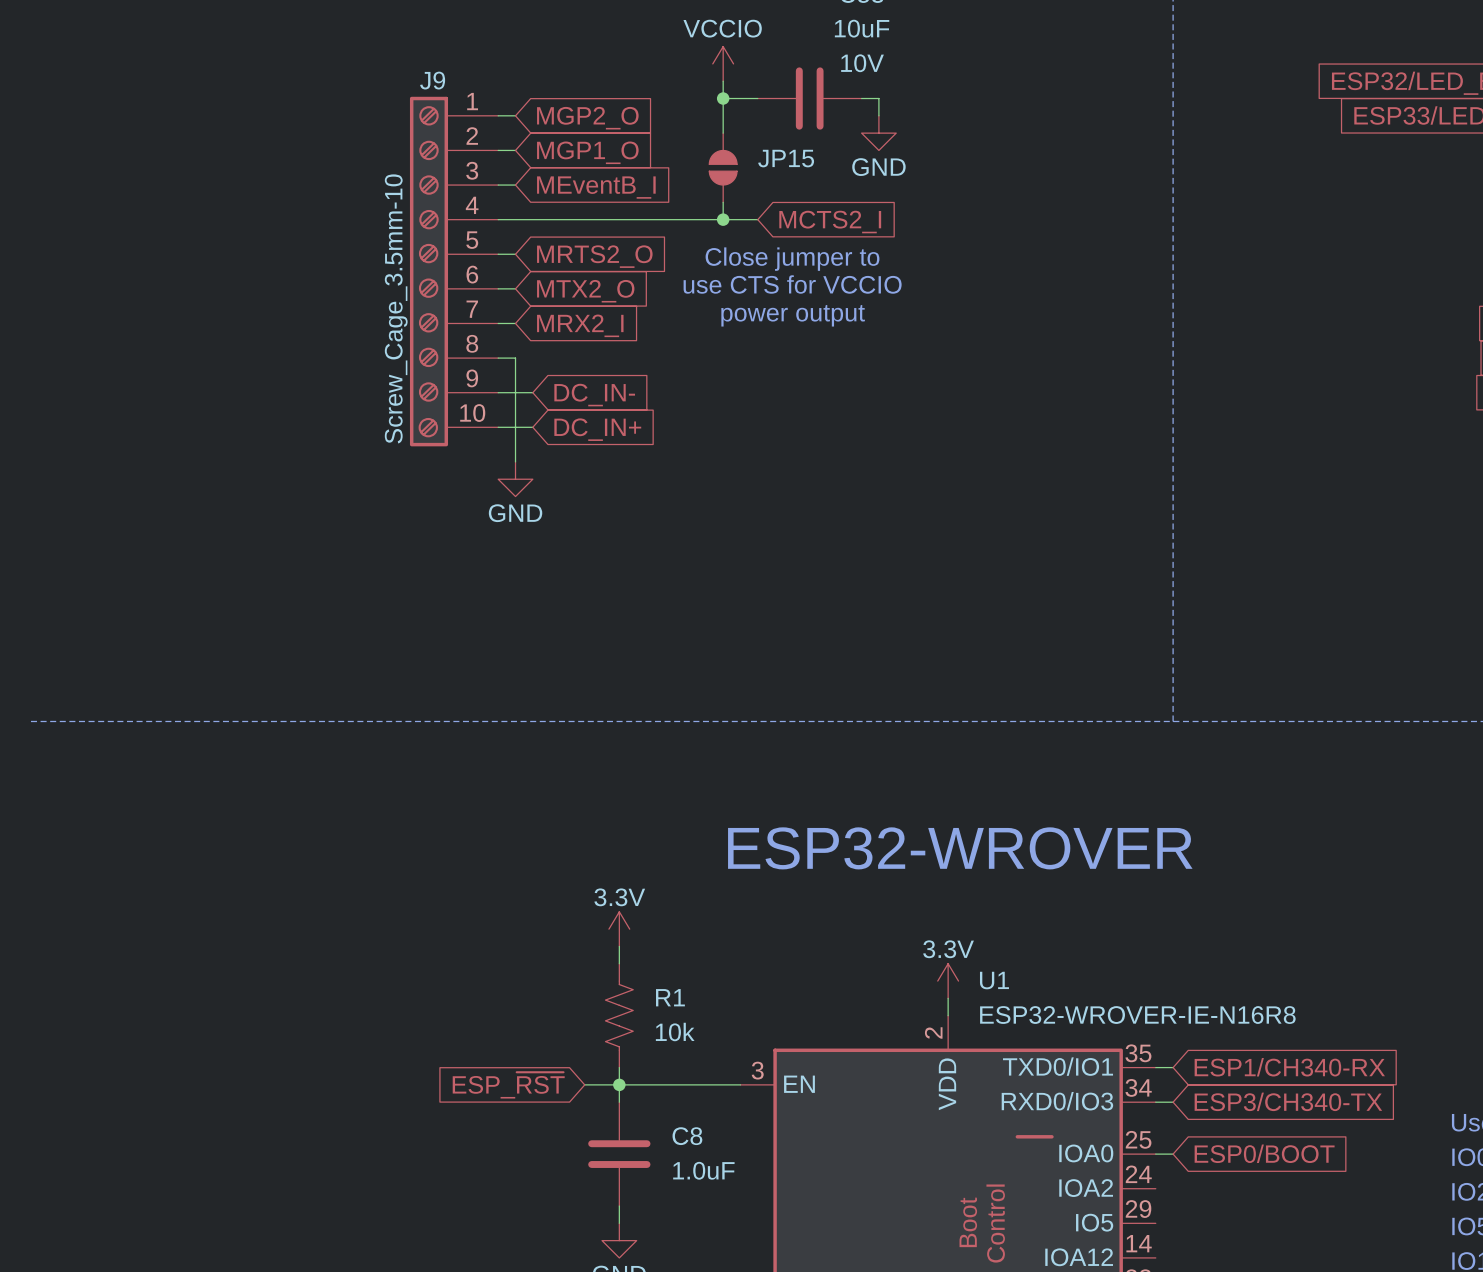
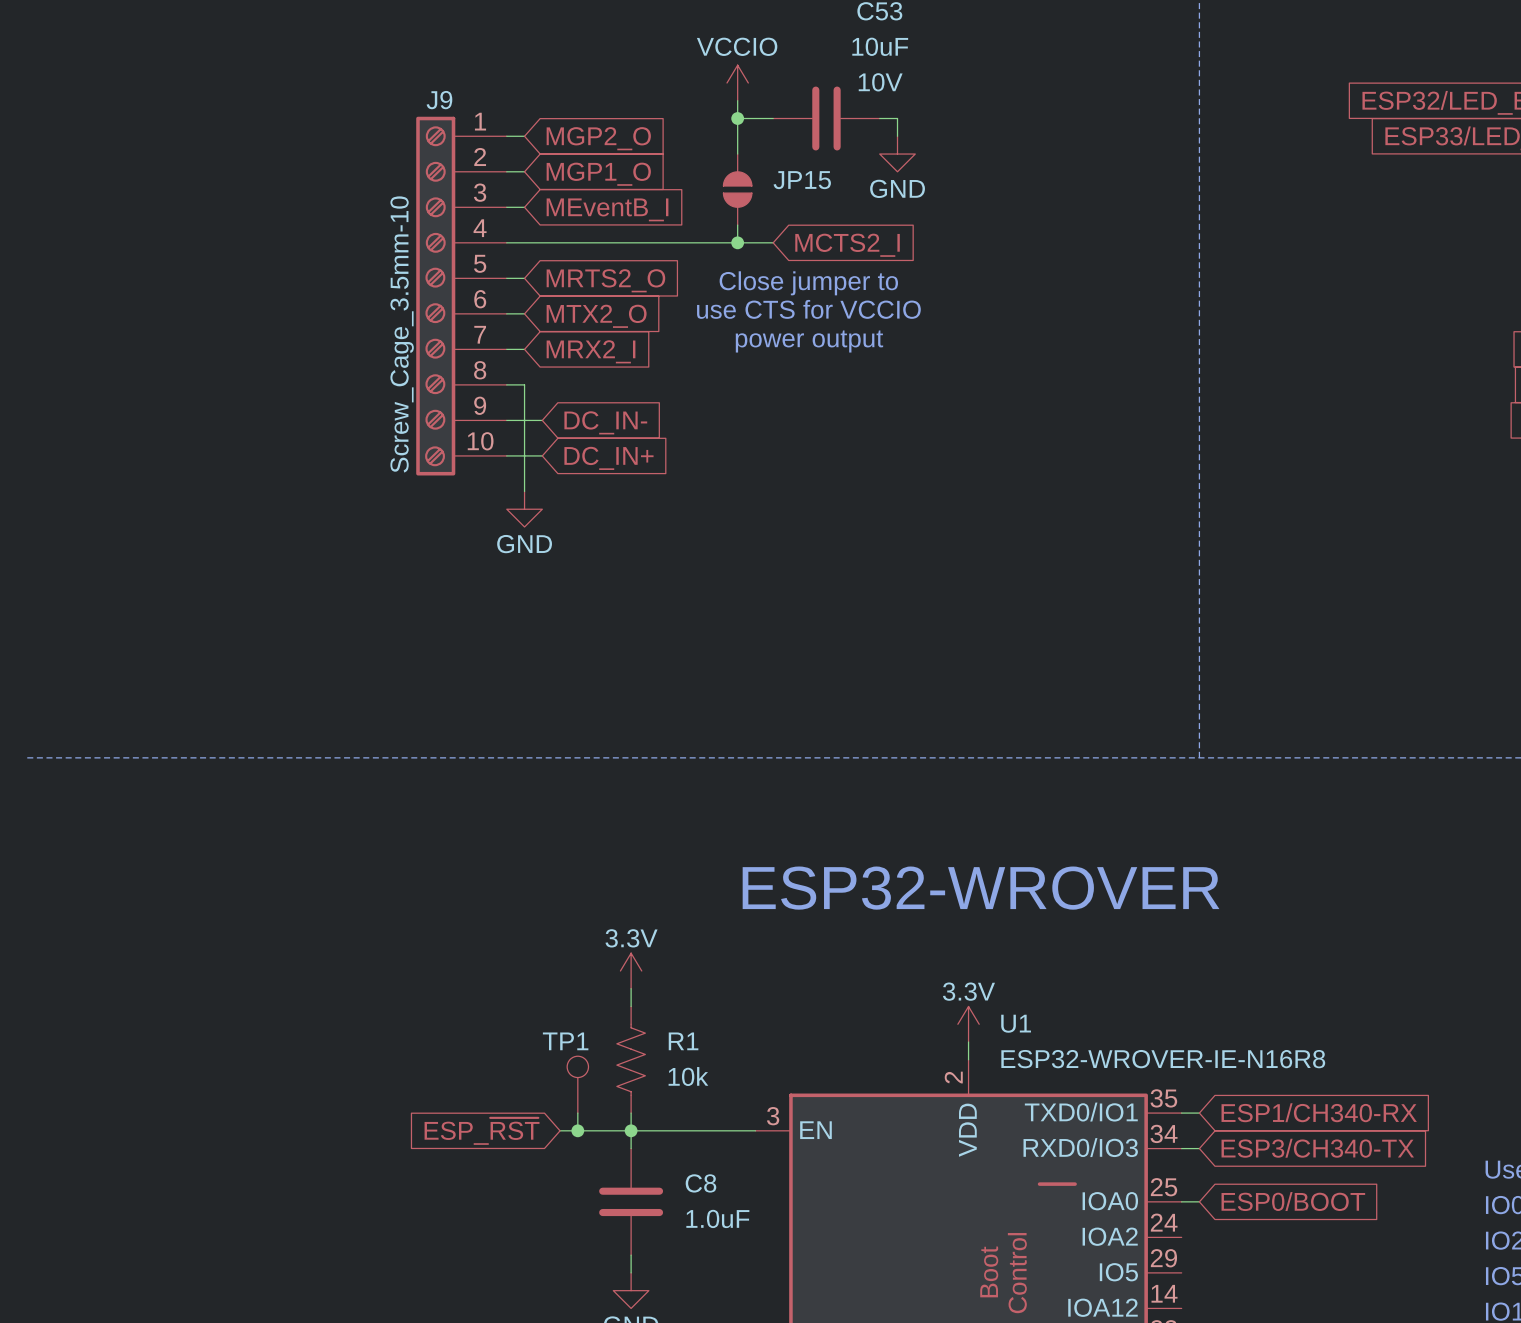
TP1: none -> (577, 1084)
wire: none -> (577, 1113) (577, 1130)
wire: none -> (560, 1130) (595, 1130)
junction: none -> (577, 1130)
global label position: ESP_~{RST} (508, 1085) -> ESP_~{RST} (482, 1131)

